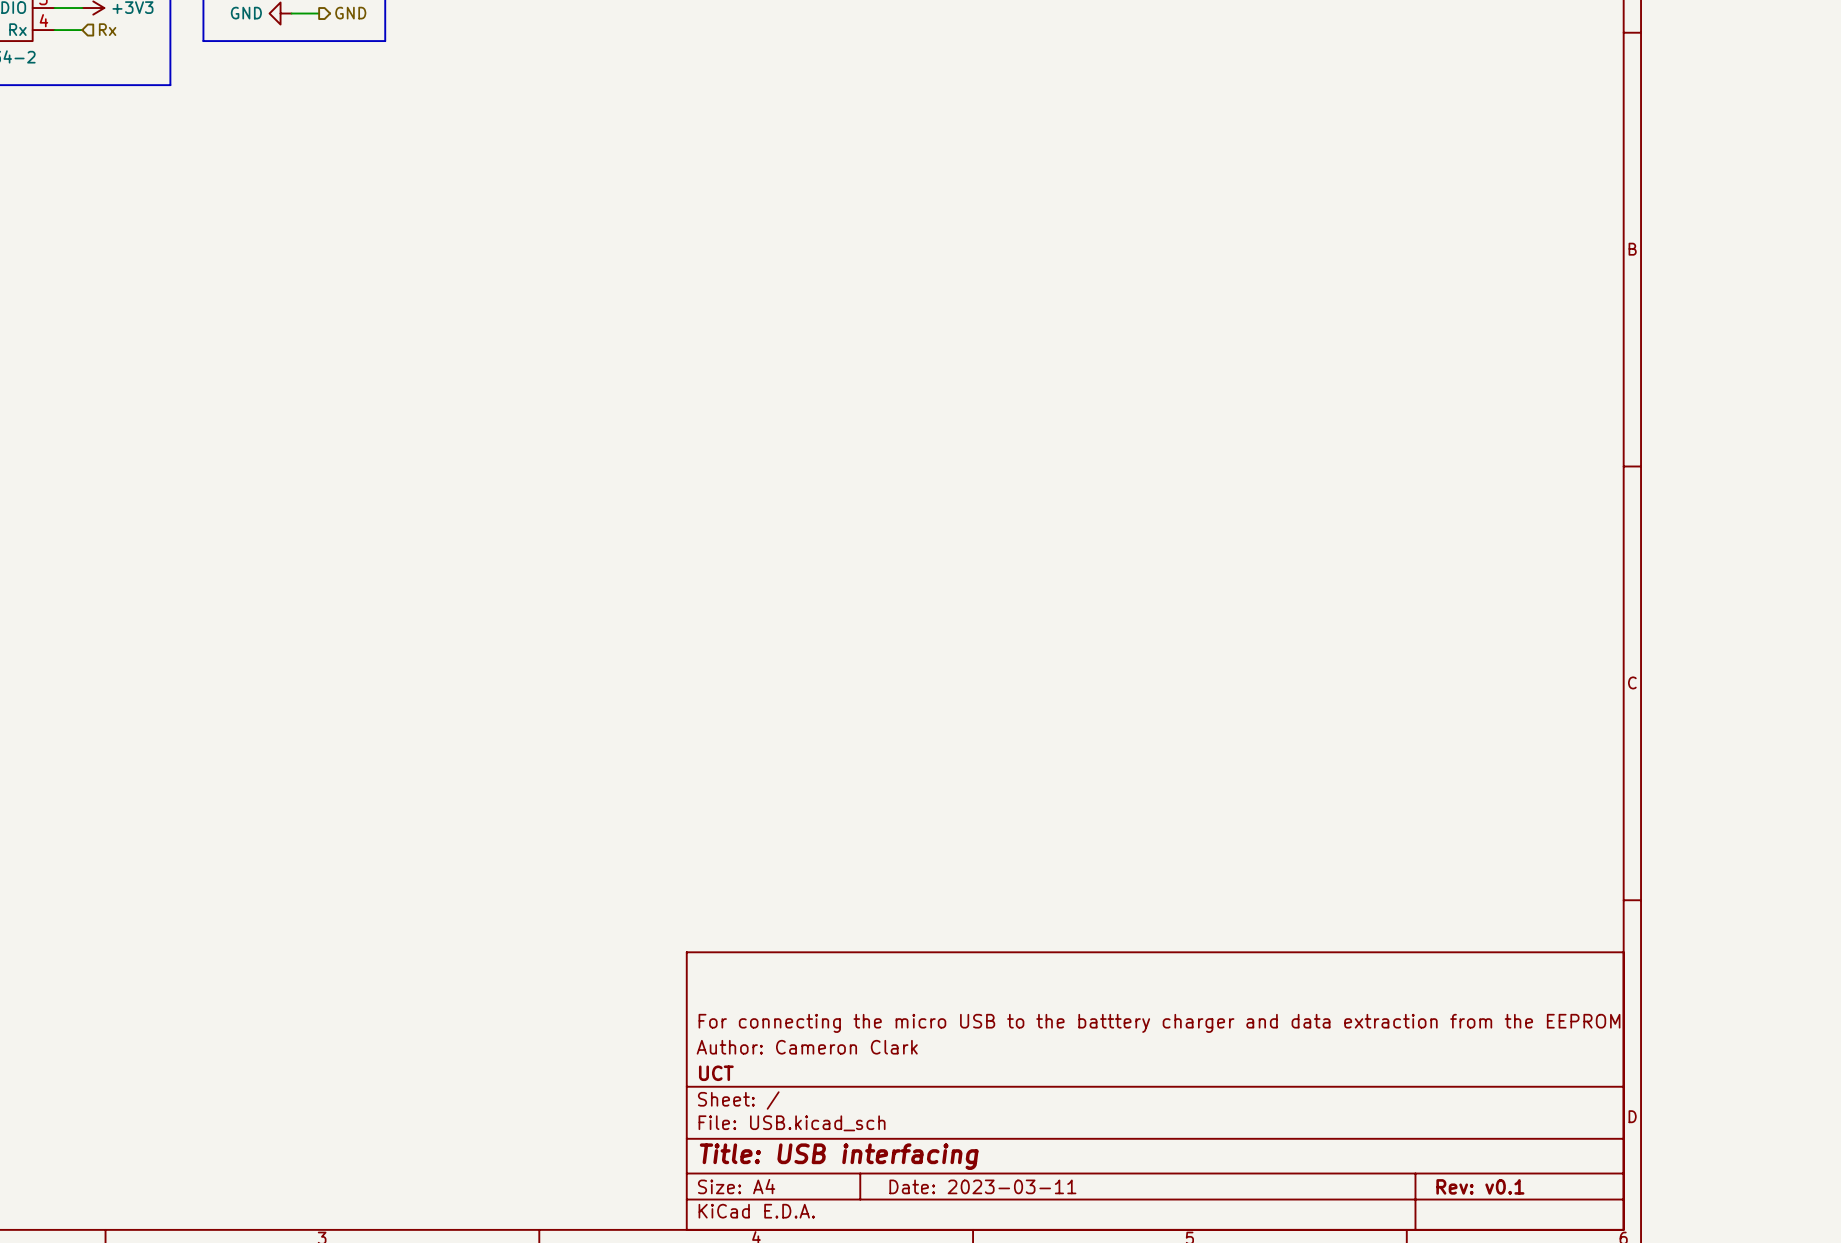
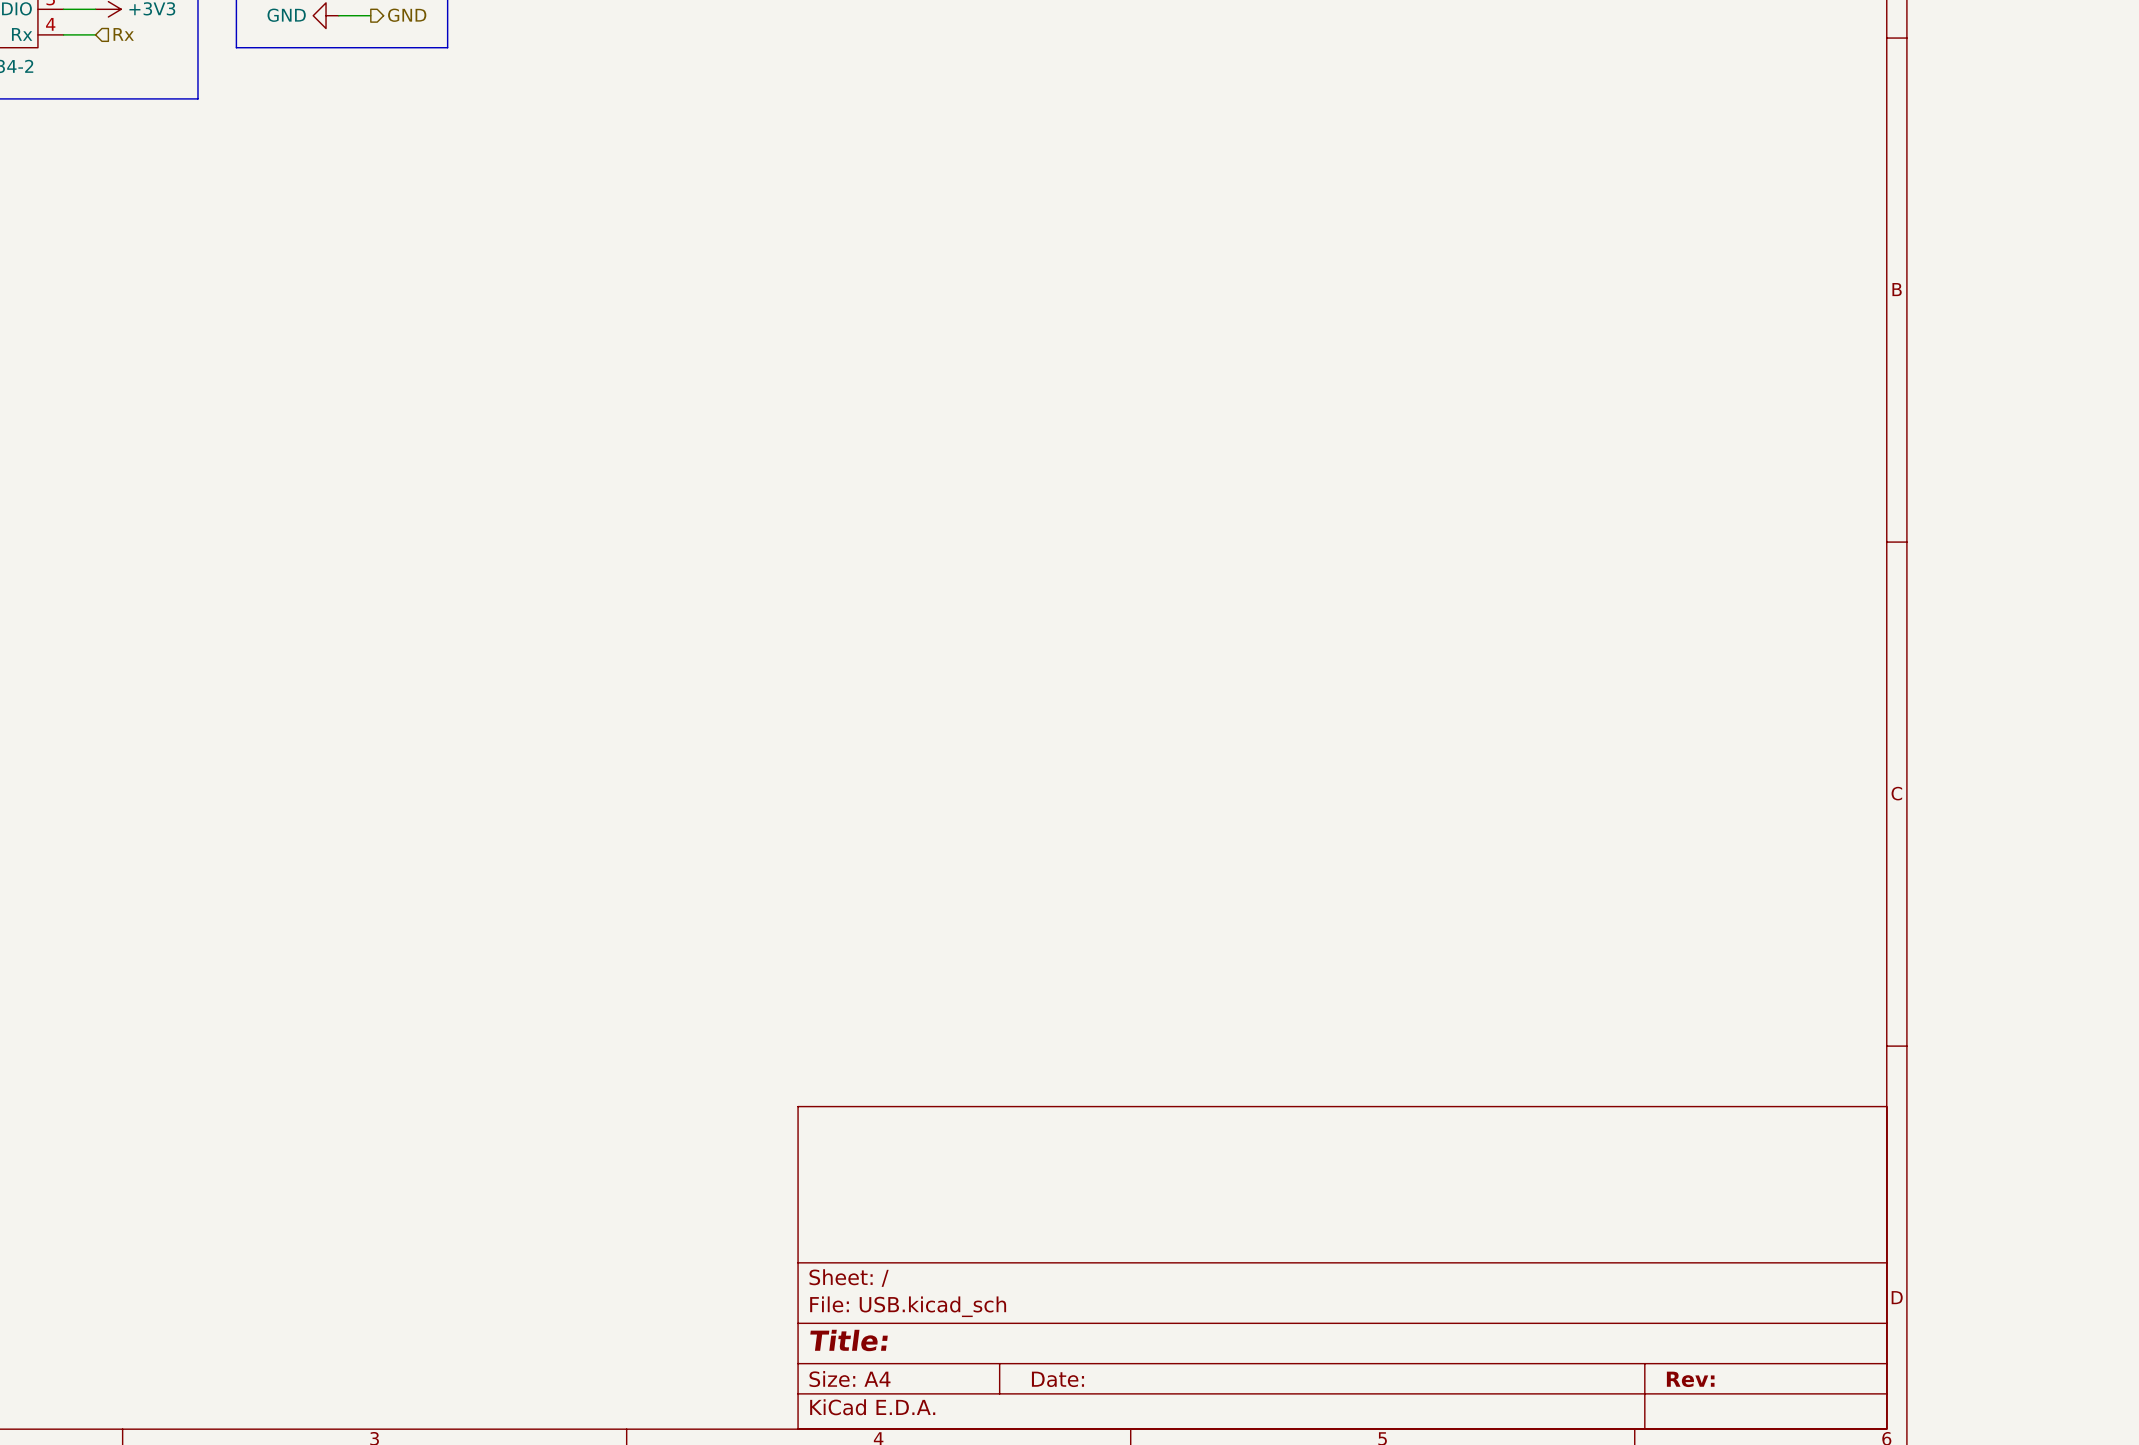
title block: For connecting the micro USB to the batttery charger and data extraction from the EEPROM (1159, 1023) -> none
title block: Author: Cameron Clark (807, 1047) -> none
title block: UCT (716, 1073) -> none
title block: Title: USB interfacing (839, 1156) -> Title: (849, 1340)
title block: Date: 2023-03-11 (982, 1186) -> Date: (1057, 1379)
title block: Rev: v0.1 (1480, 1186) -> Rev: (1690, 1379)

